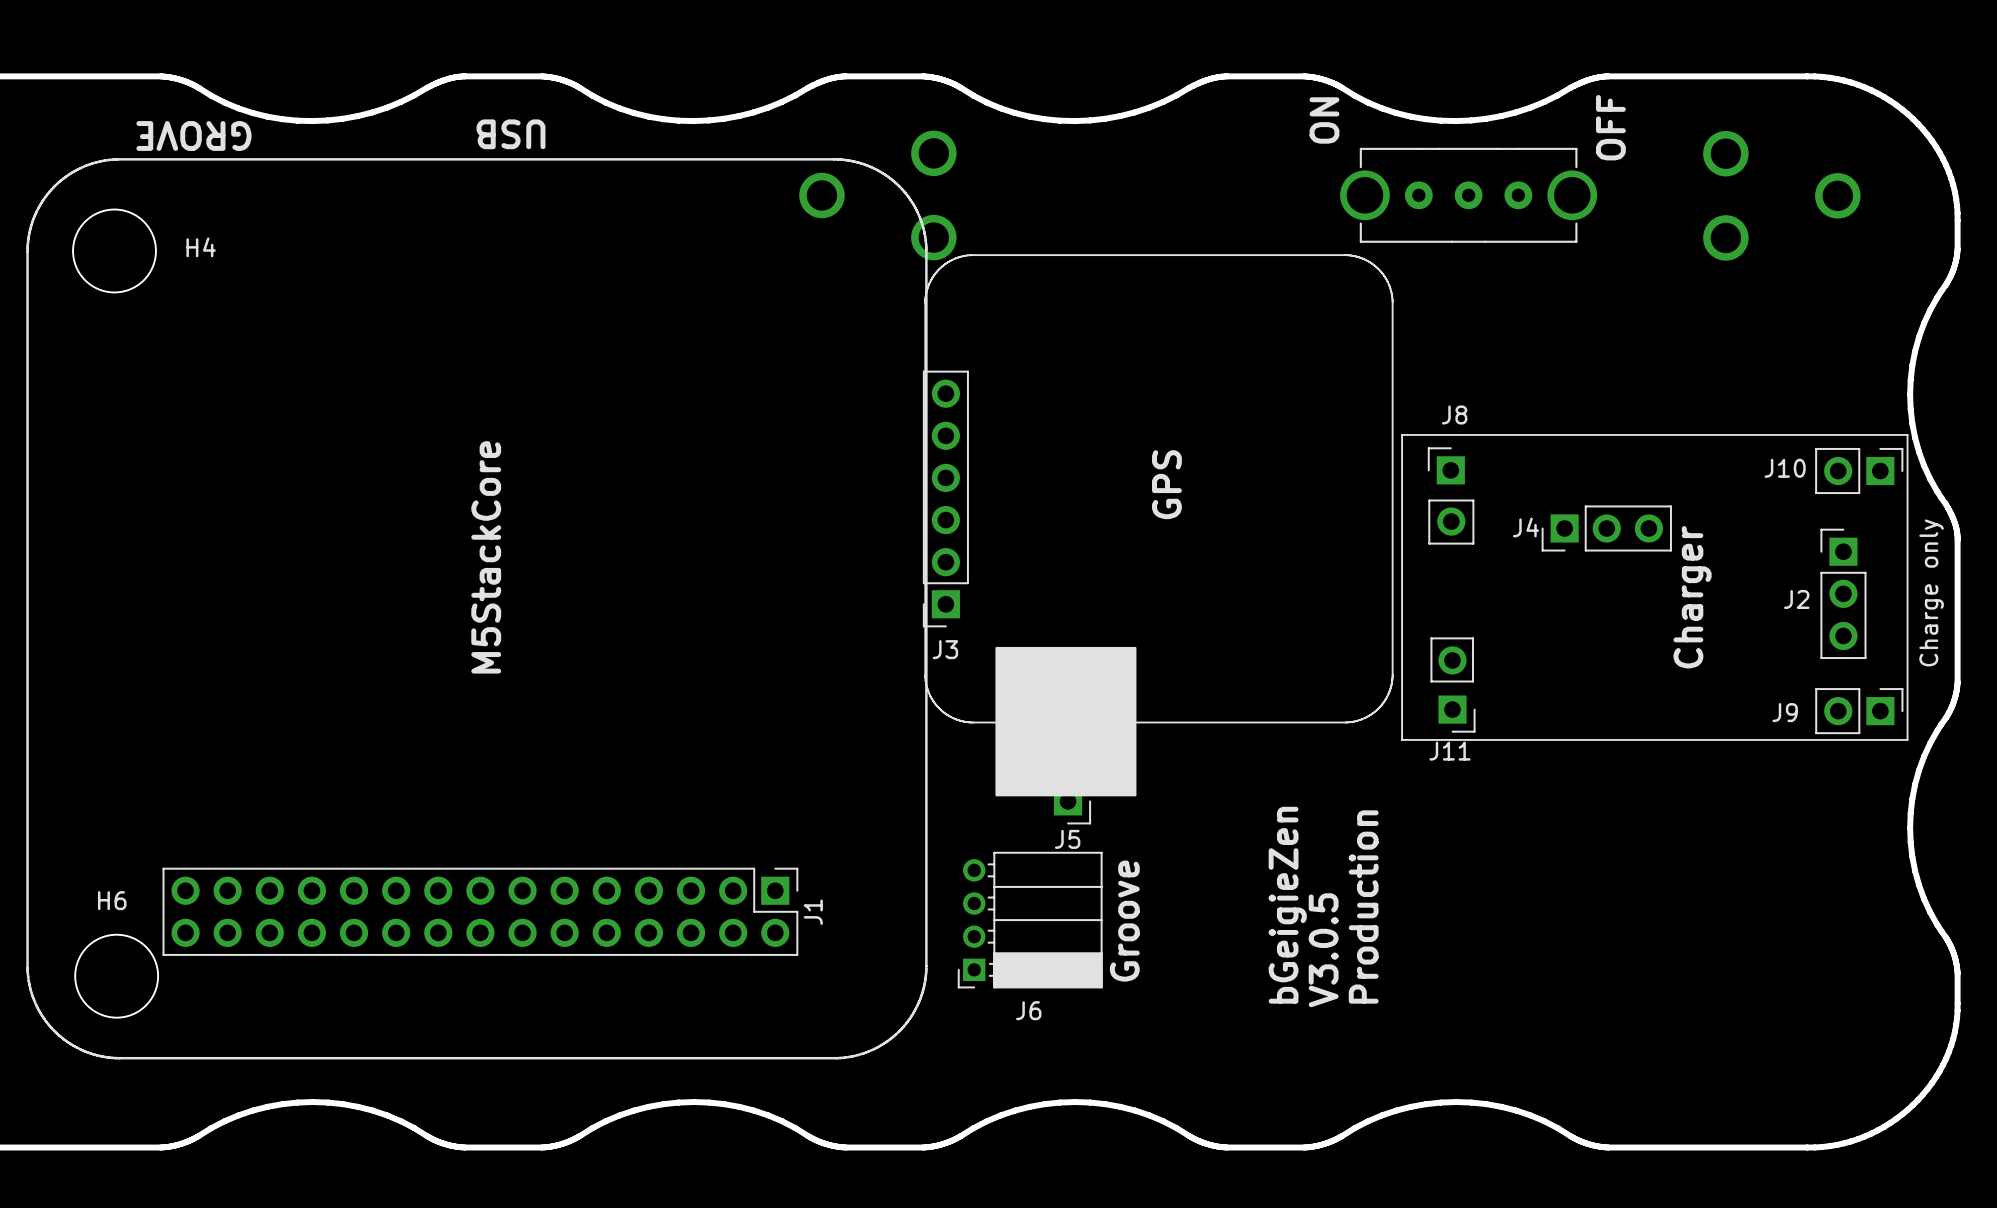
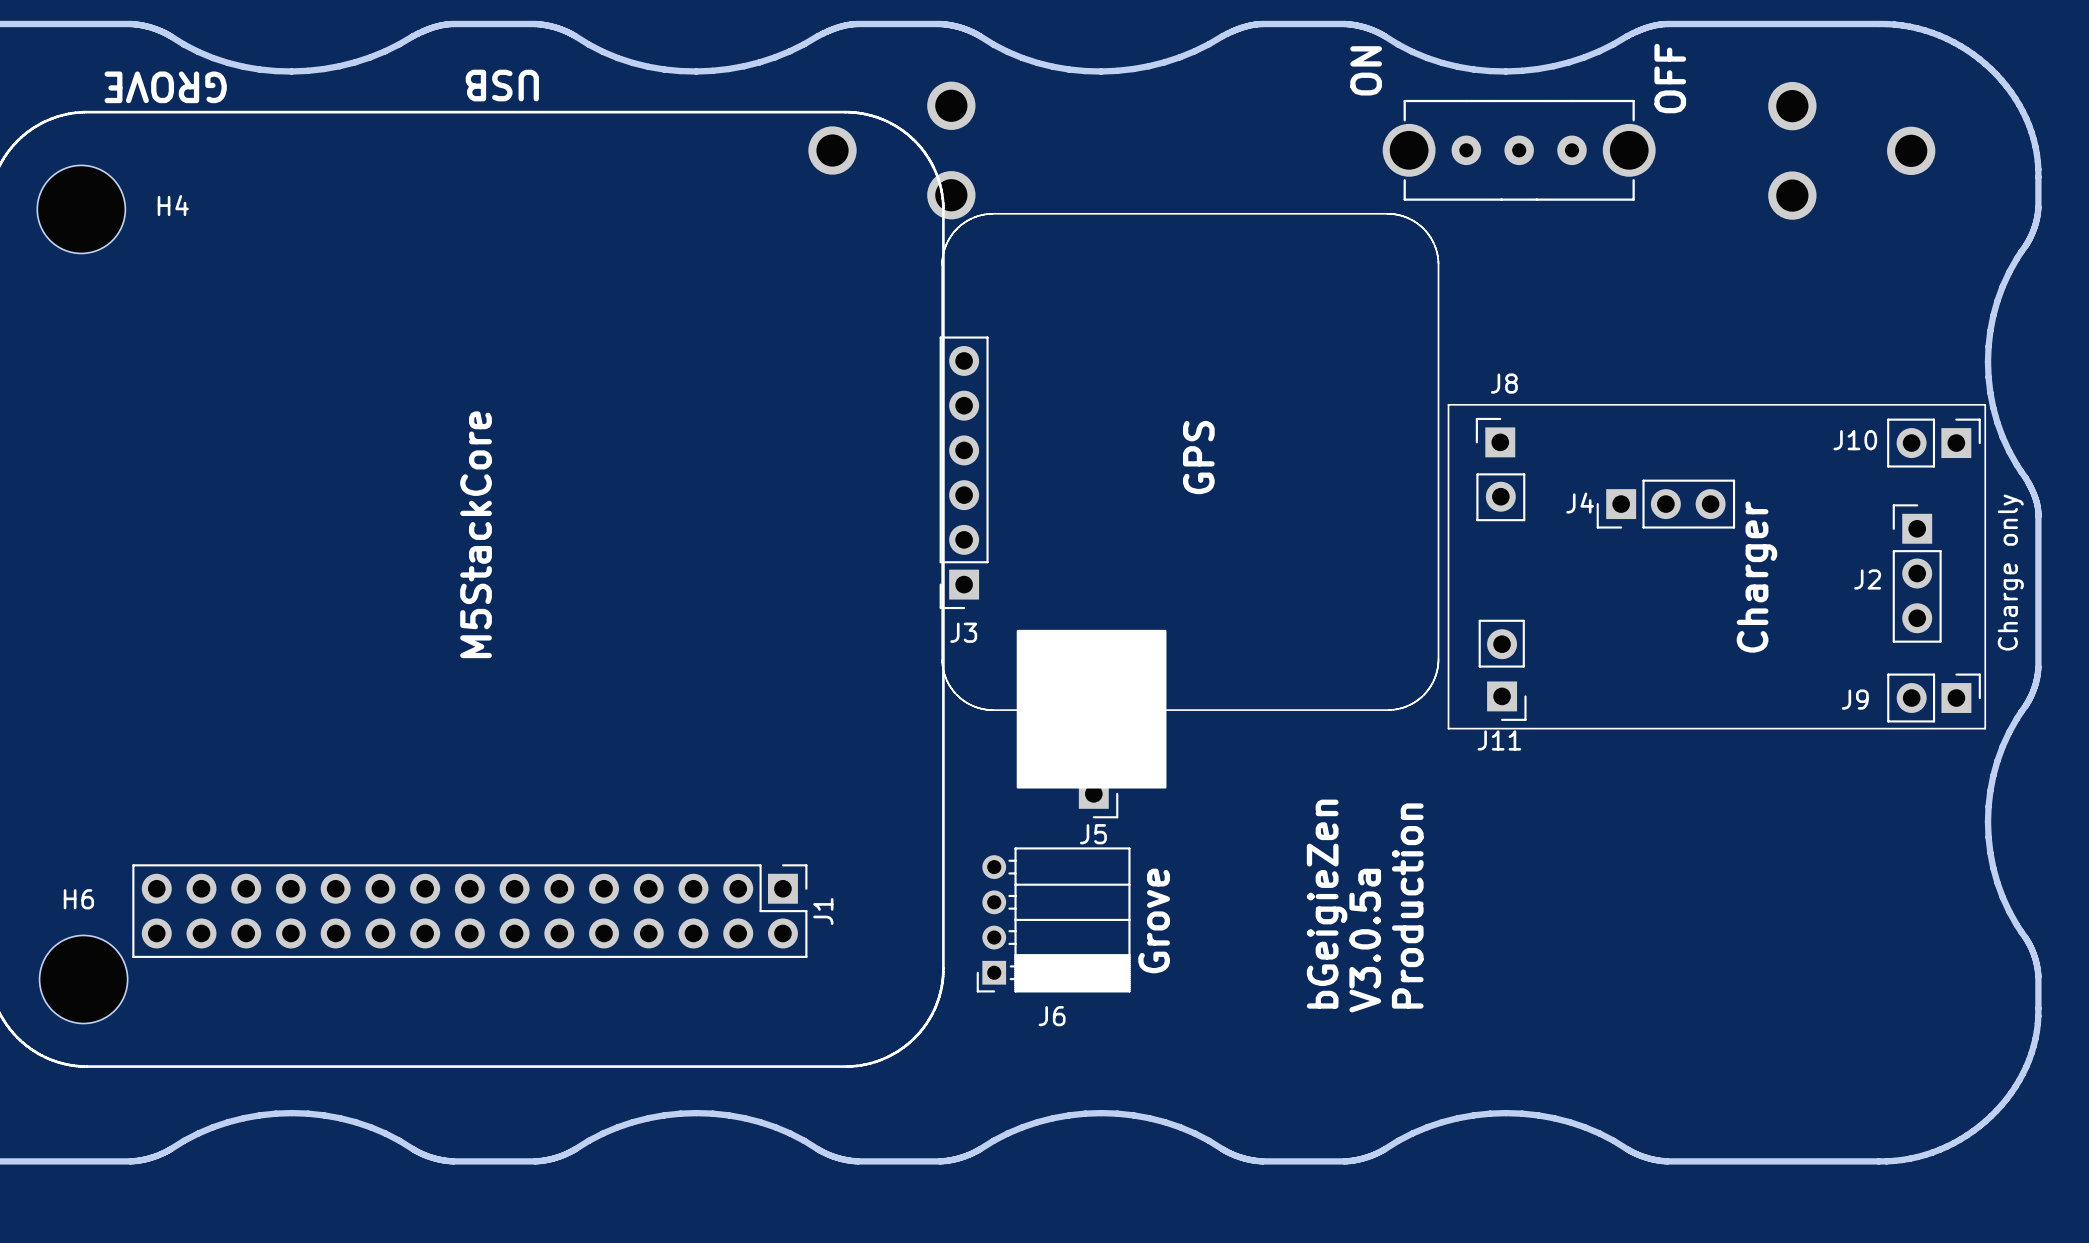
text: Groove (1124, 921) -> Grove (1154, 920)
text: V3.0.5 (1323, 950) -> V3.0.5a (1365, 940)

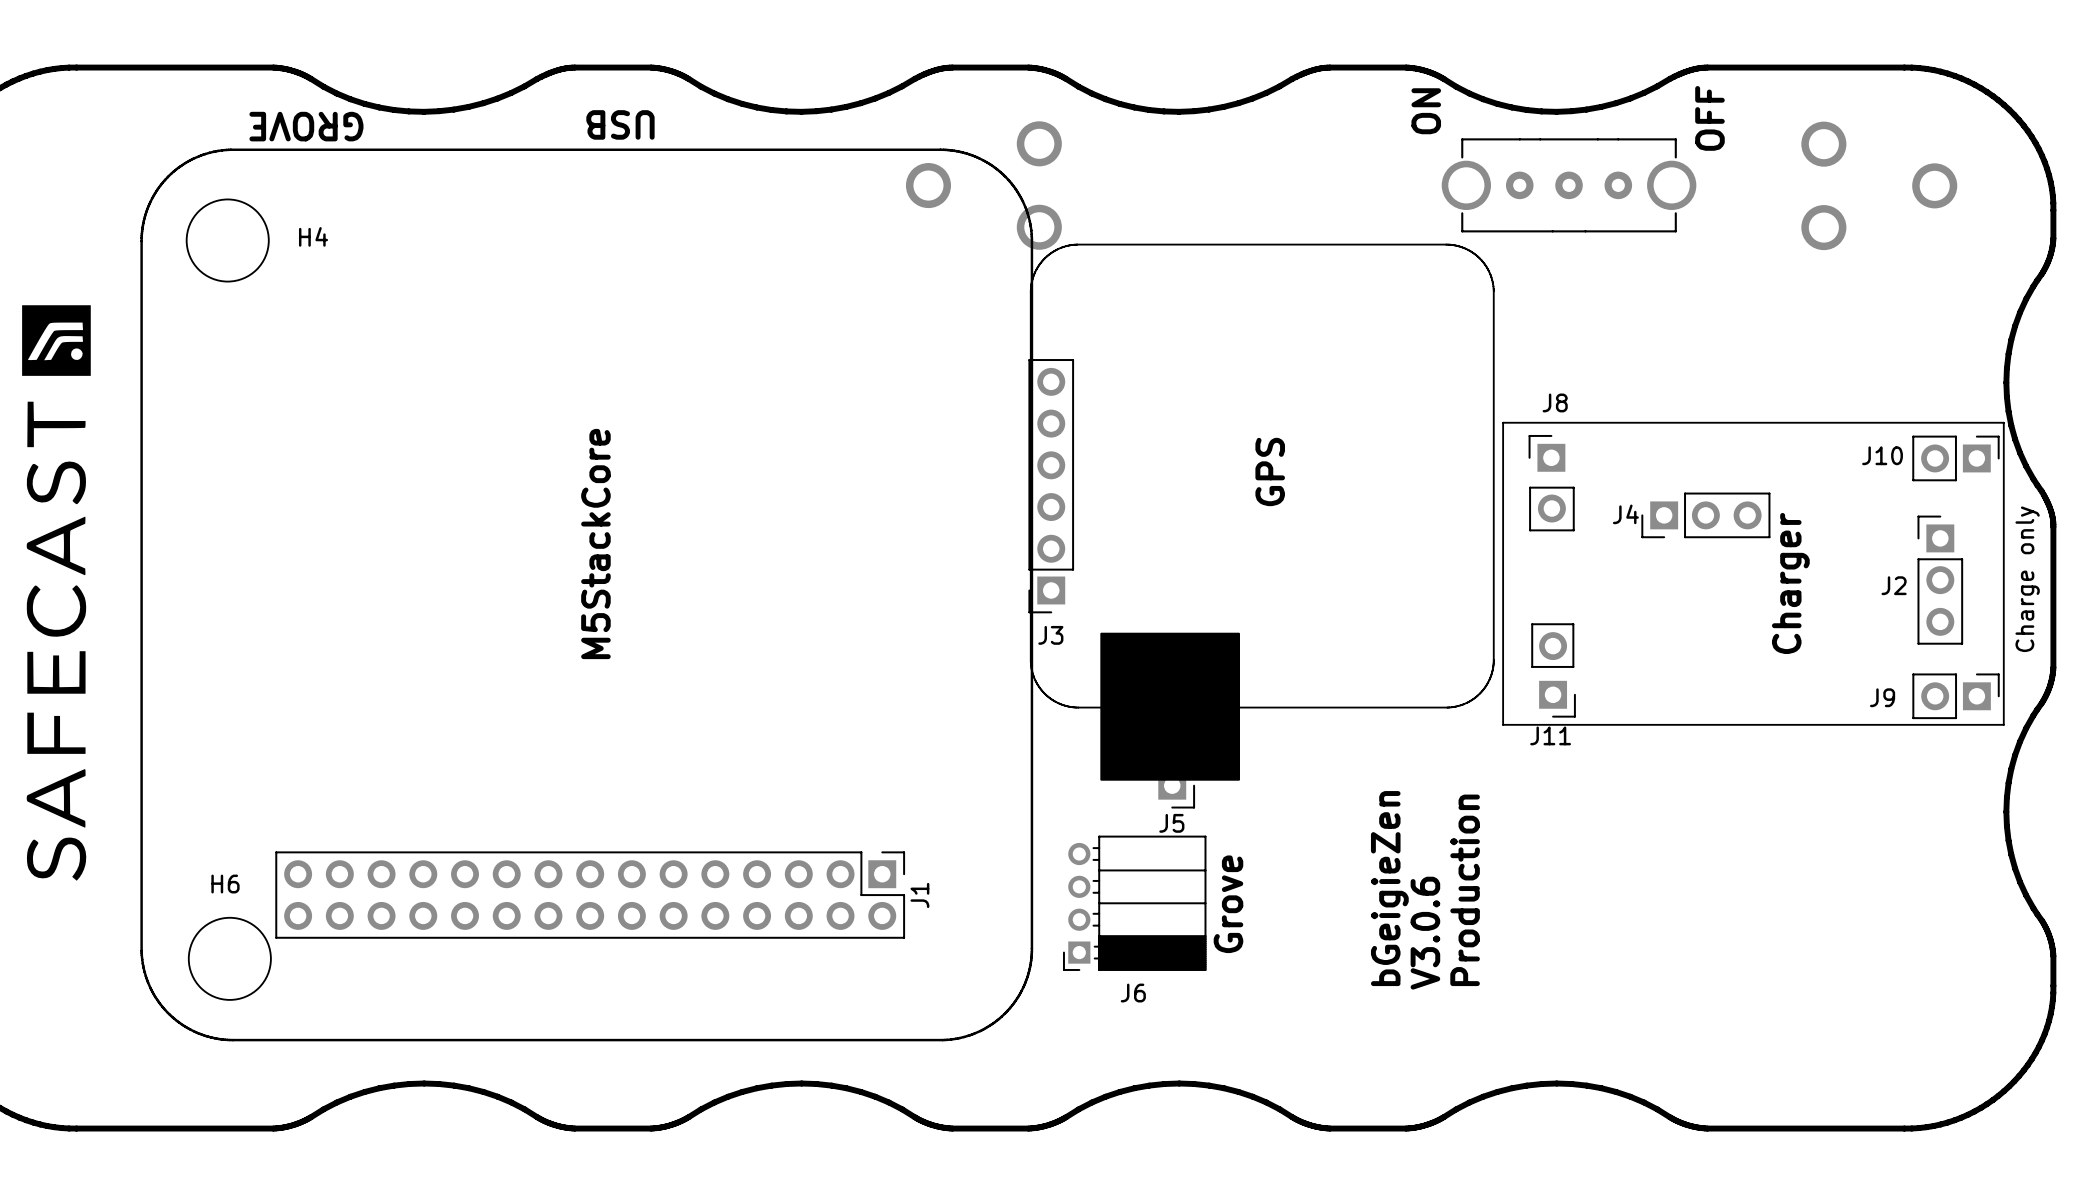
text: V3.0.5a (1365, 940) -> V3.0.6 (1425, 933)

